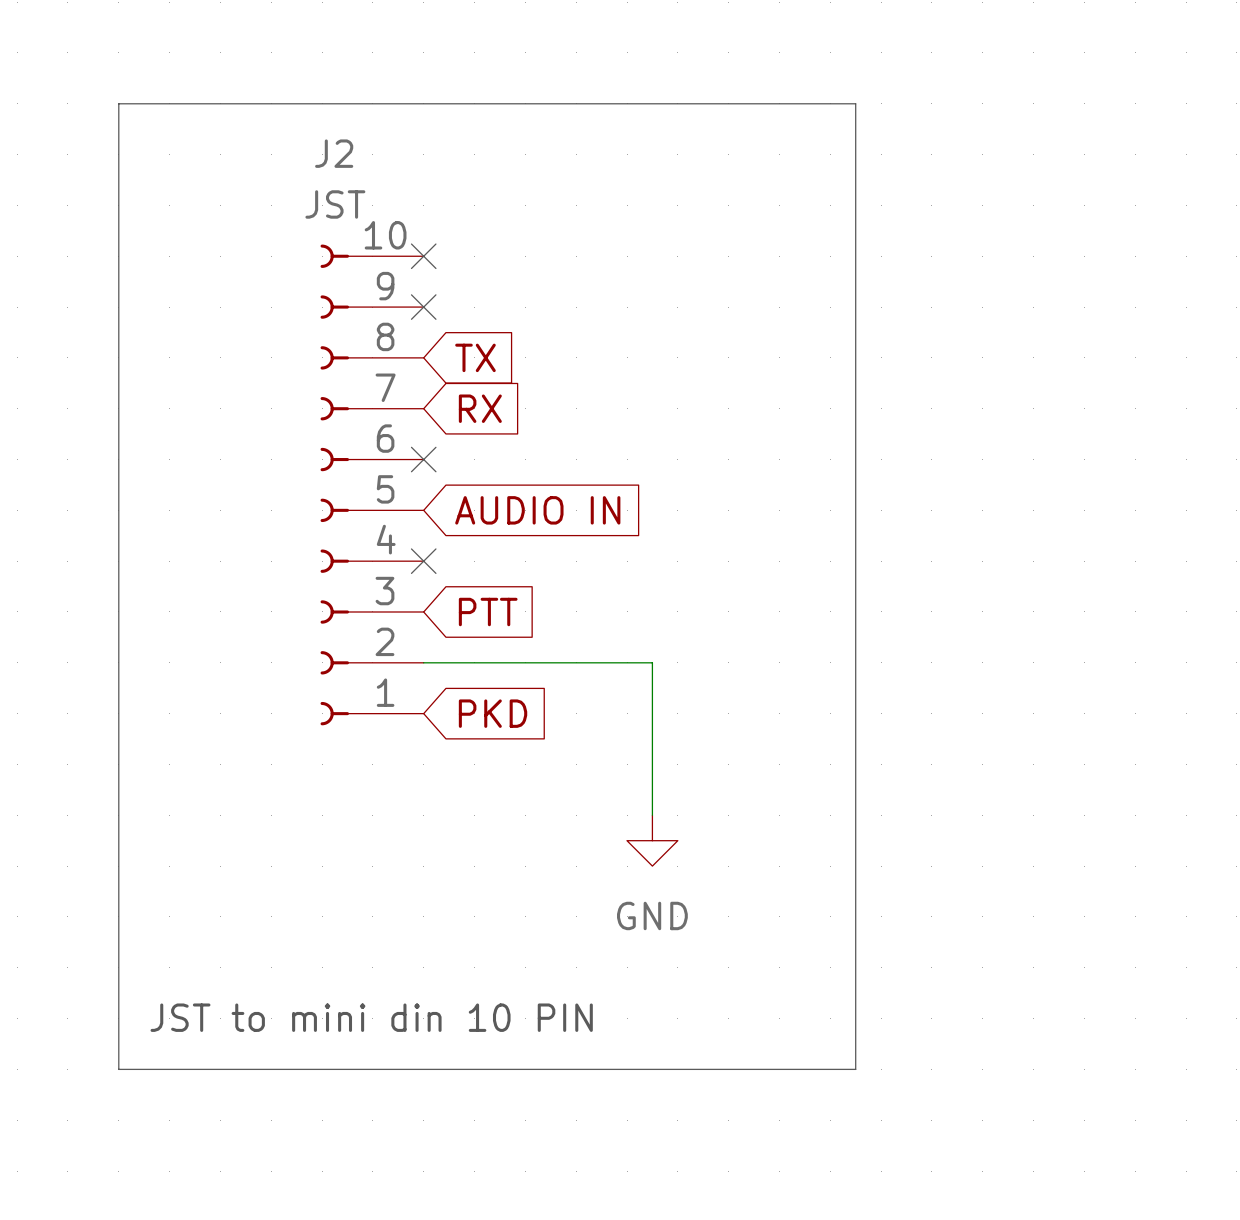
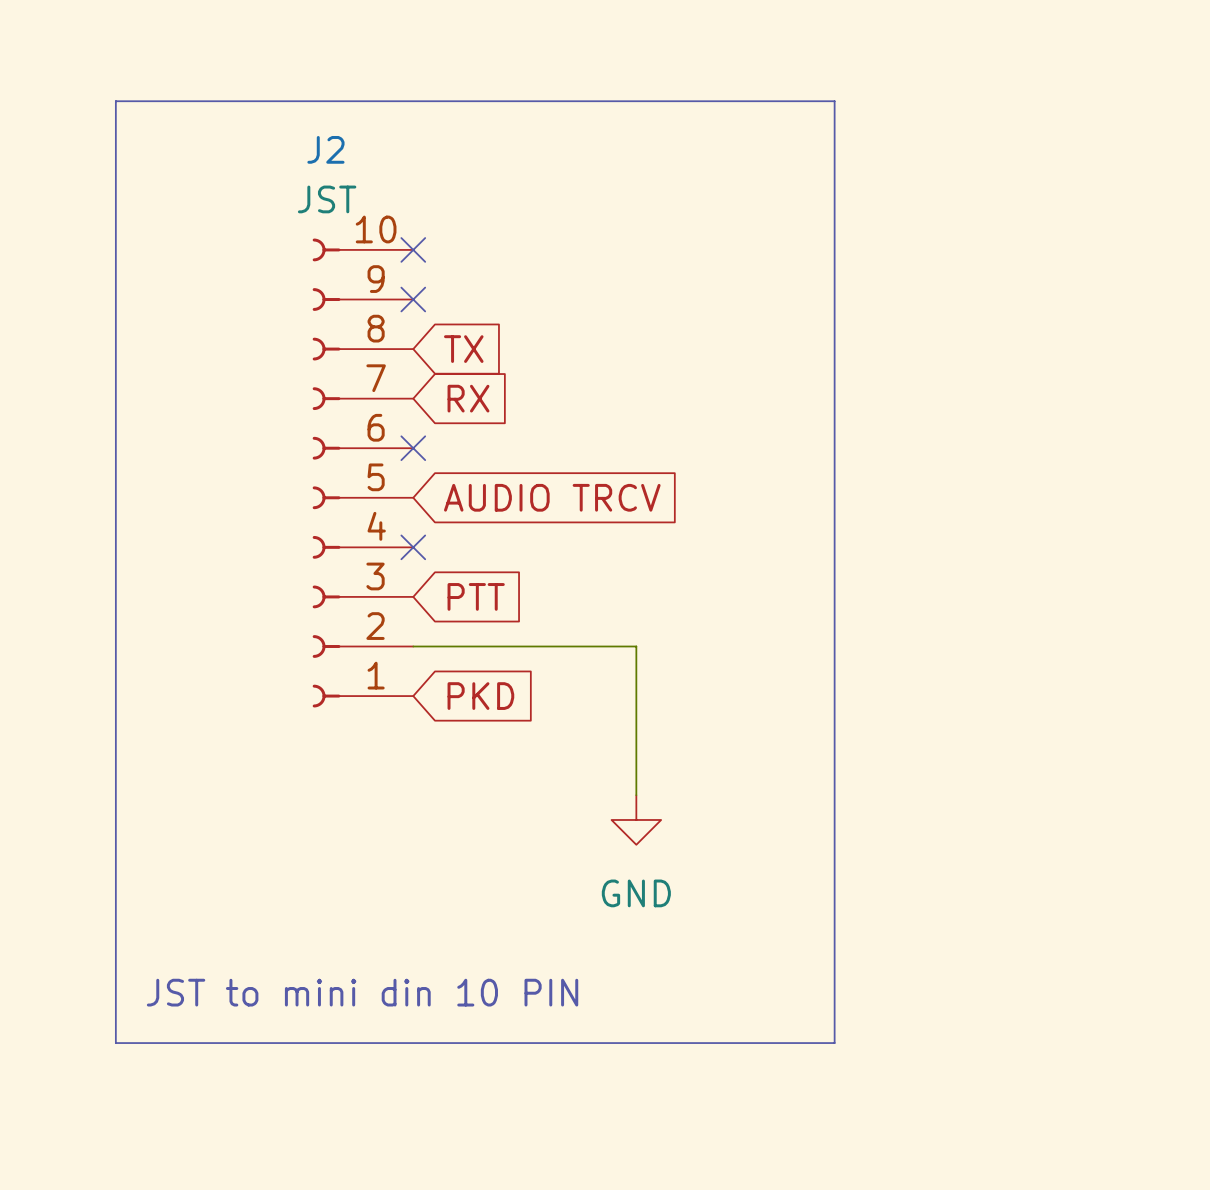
global label: AUDIO IN (537, 510) -> AUDIO TRCV (552, 497)

